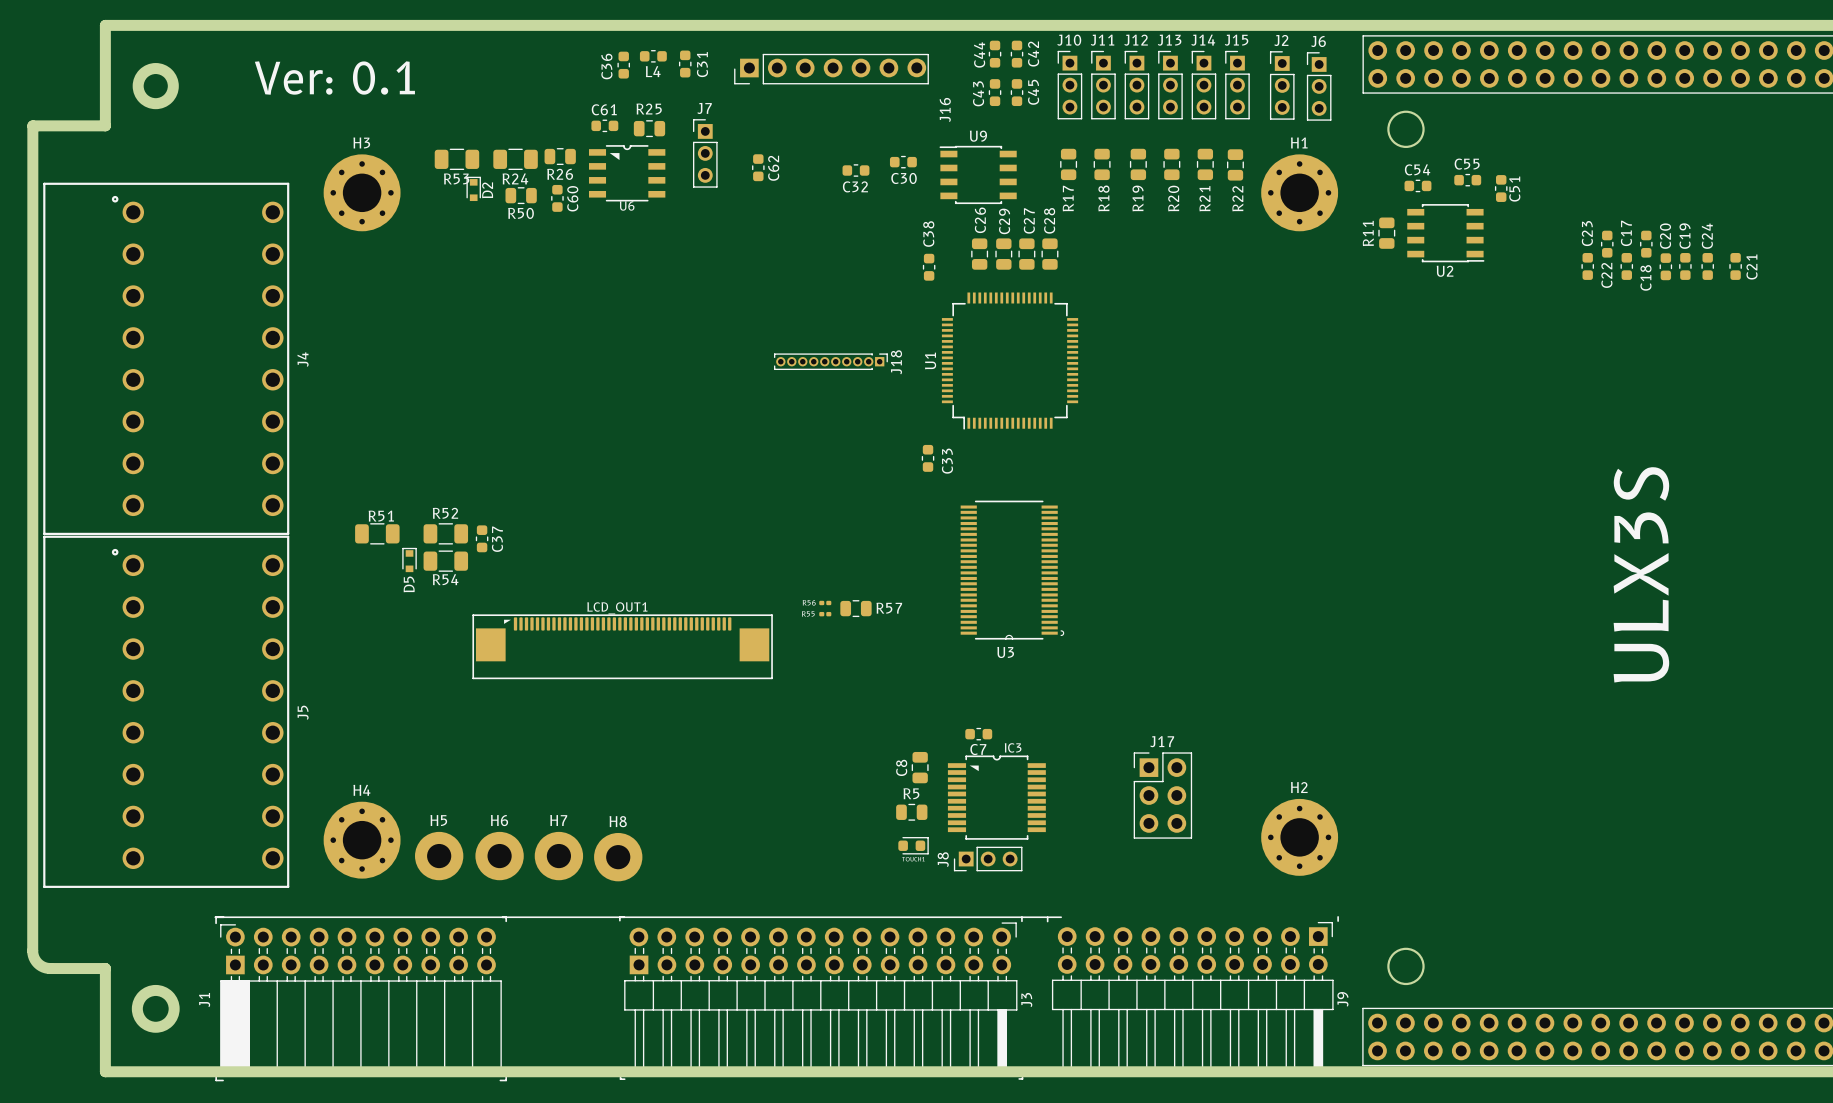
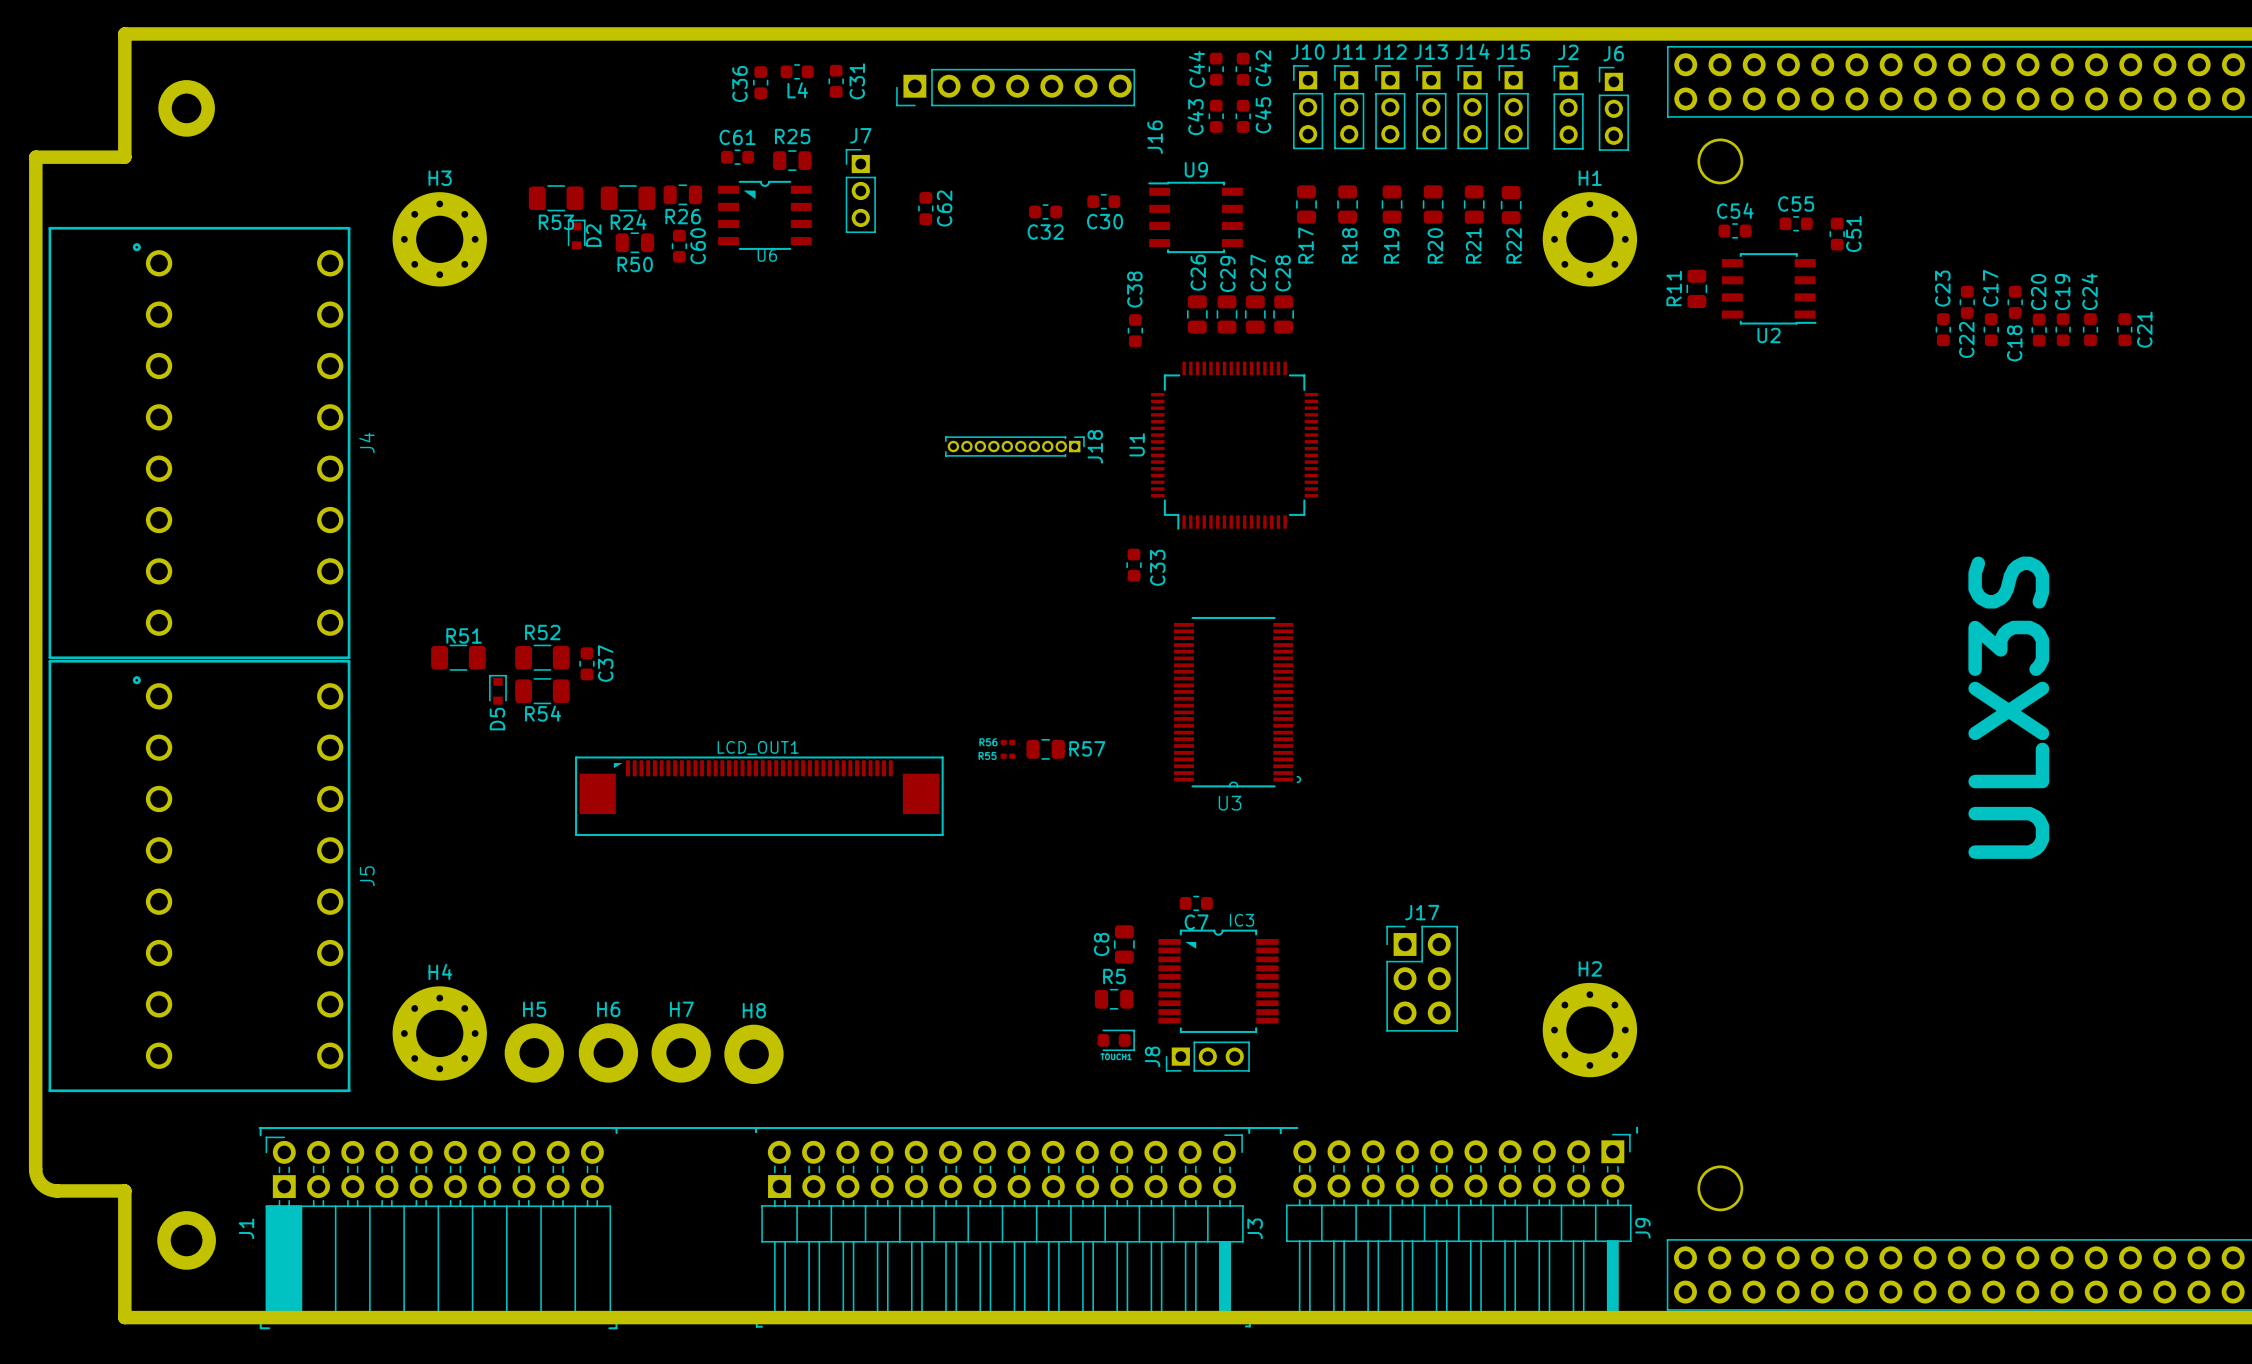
text: Ver: 0.1 (334, 78) -> none

